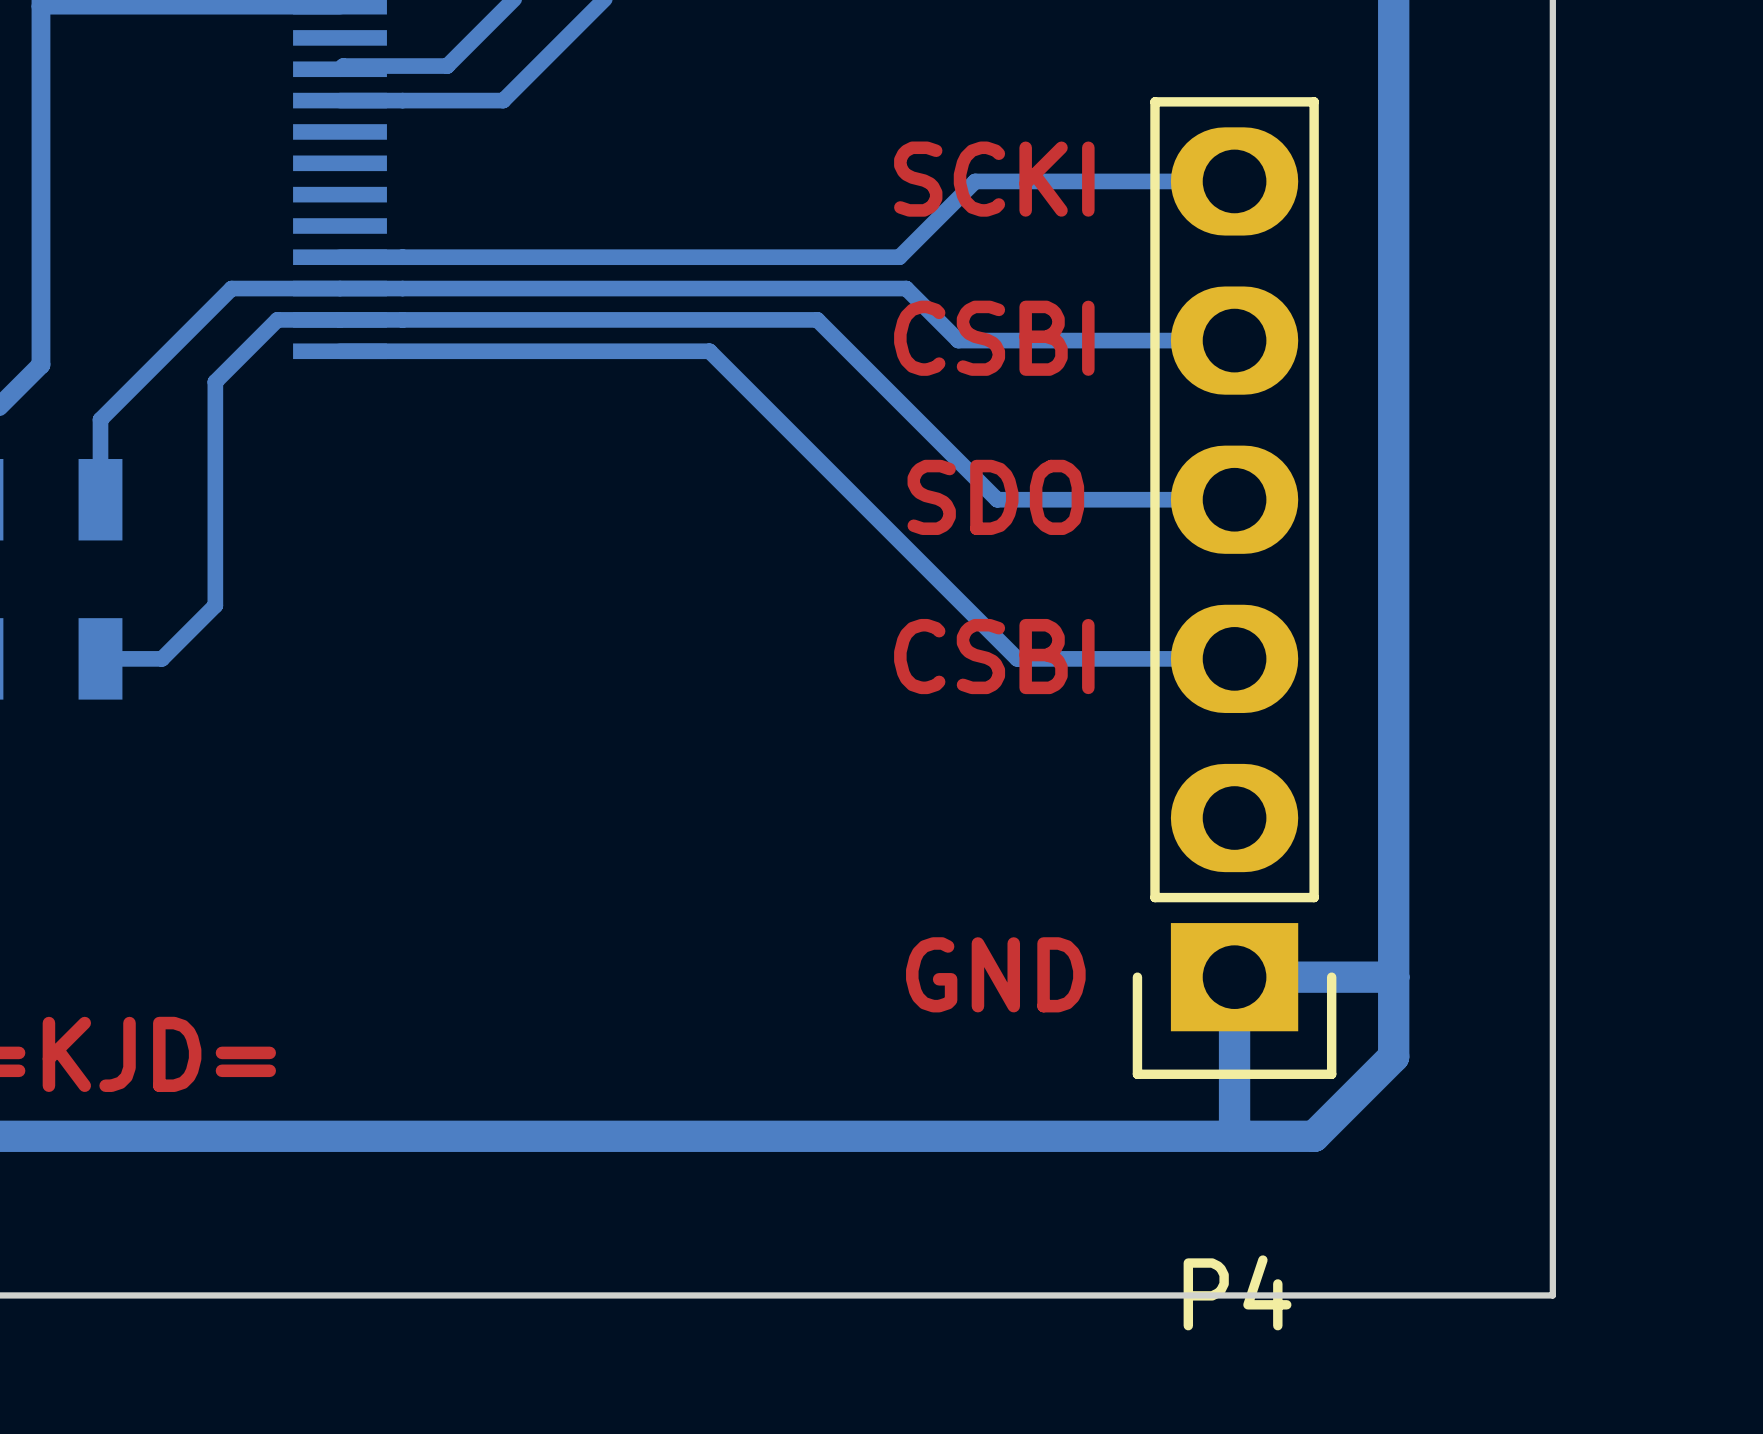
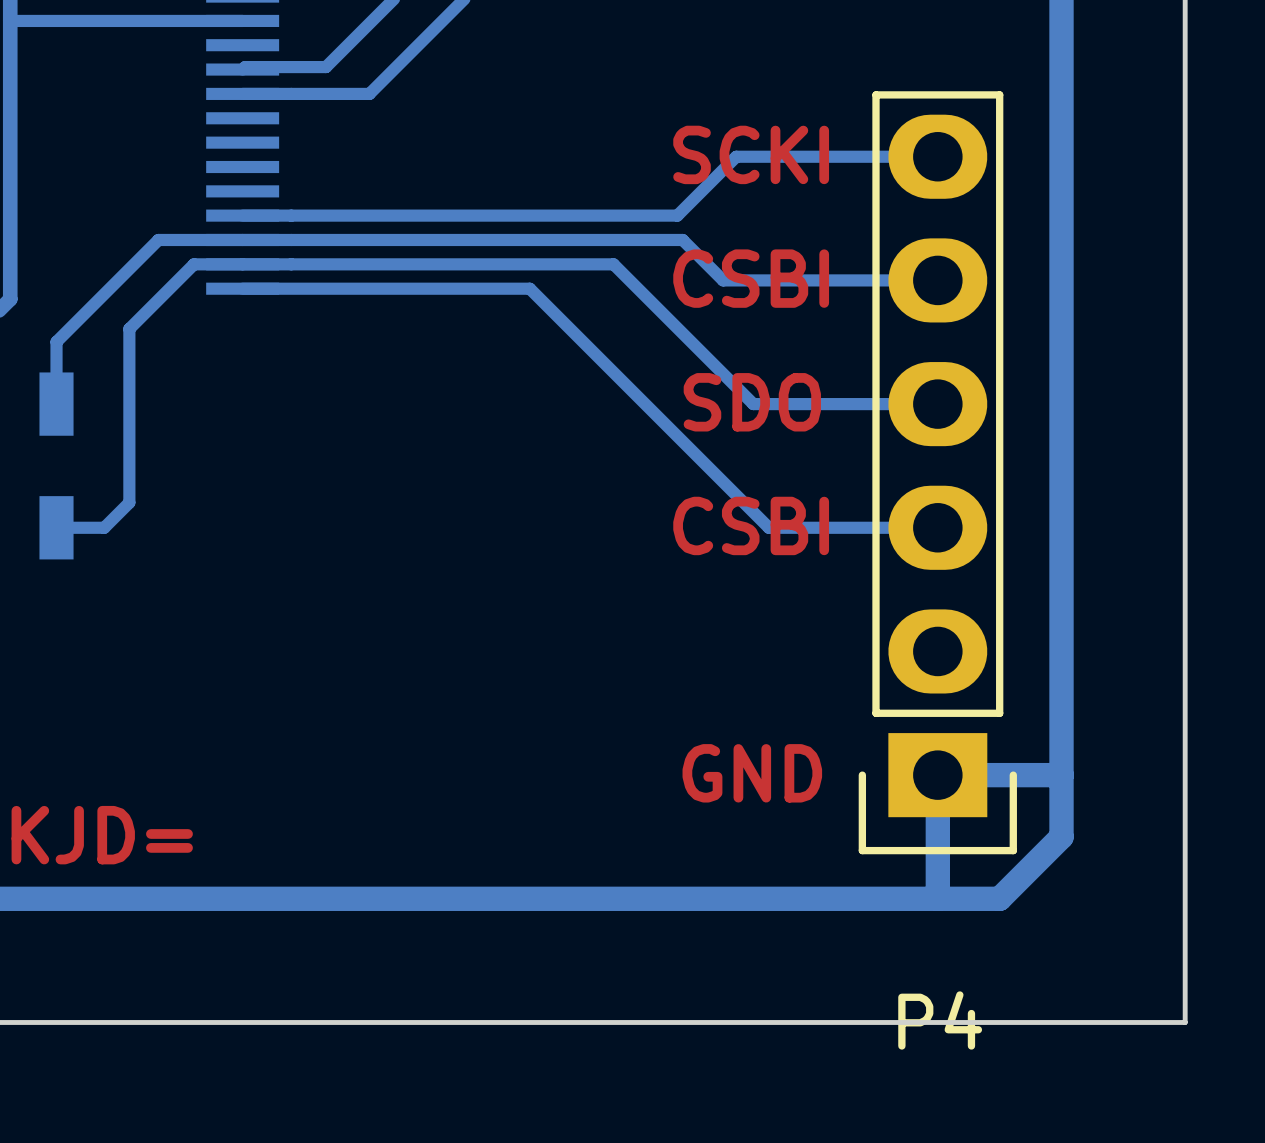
bottom track: (215, 381) (215, 605) (194, 626) -> (145, 312) (129, 328) (129, 502)

